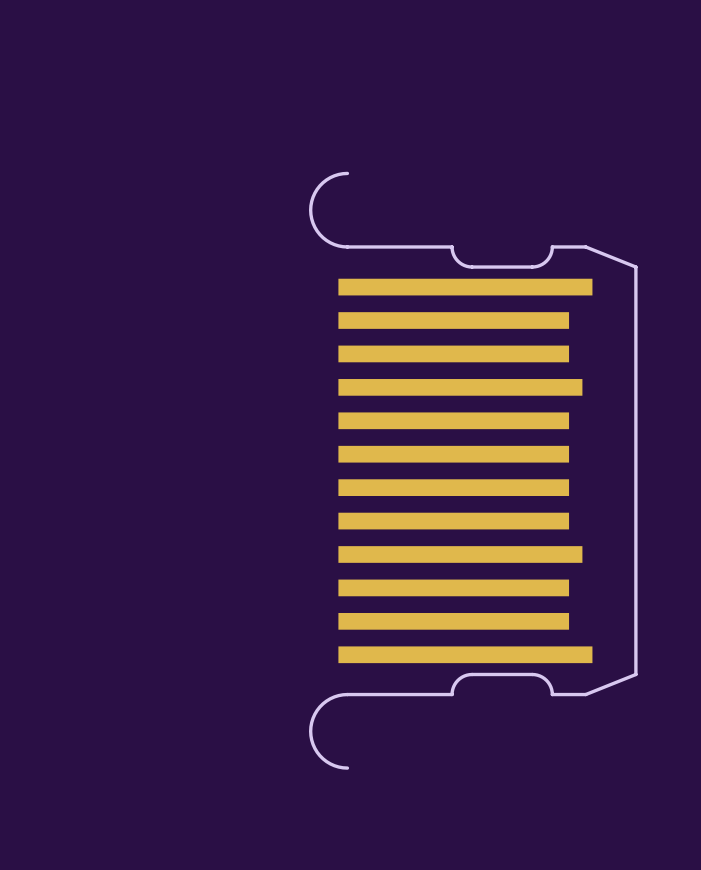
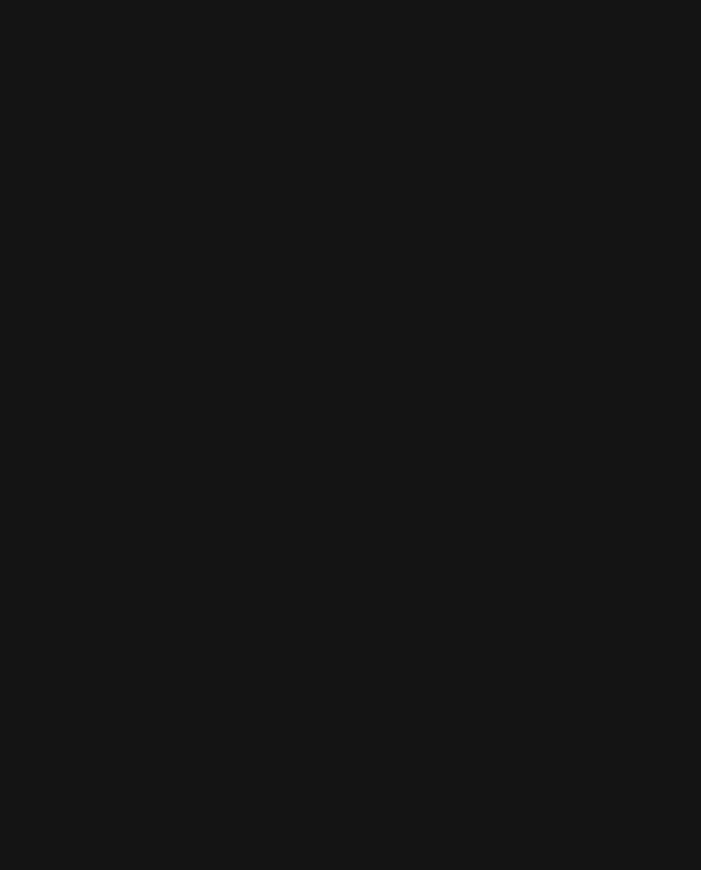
part: (473, 470) -> none

